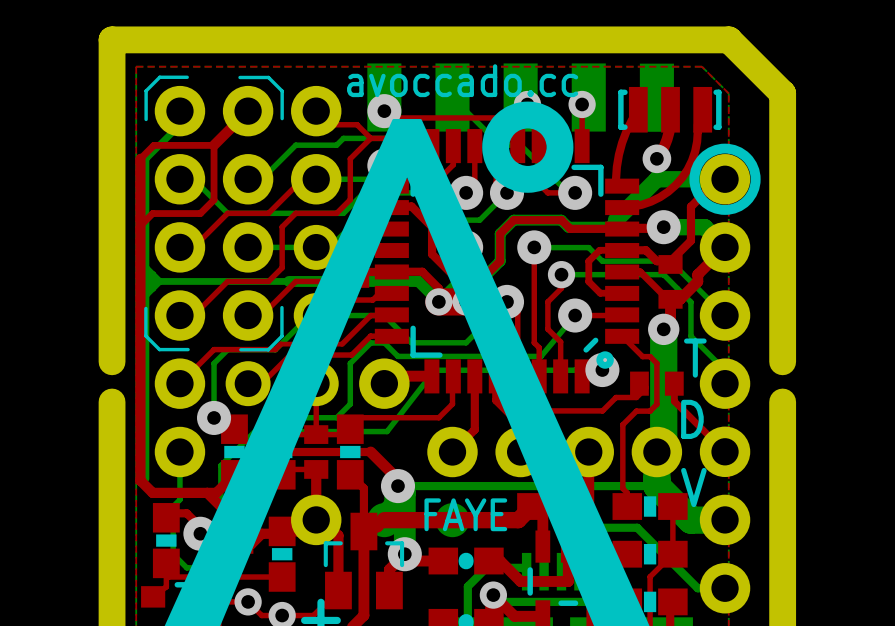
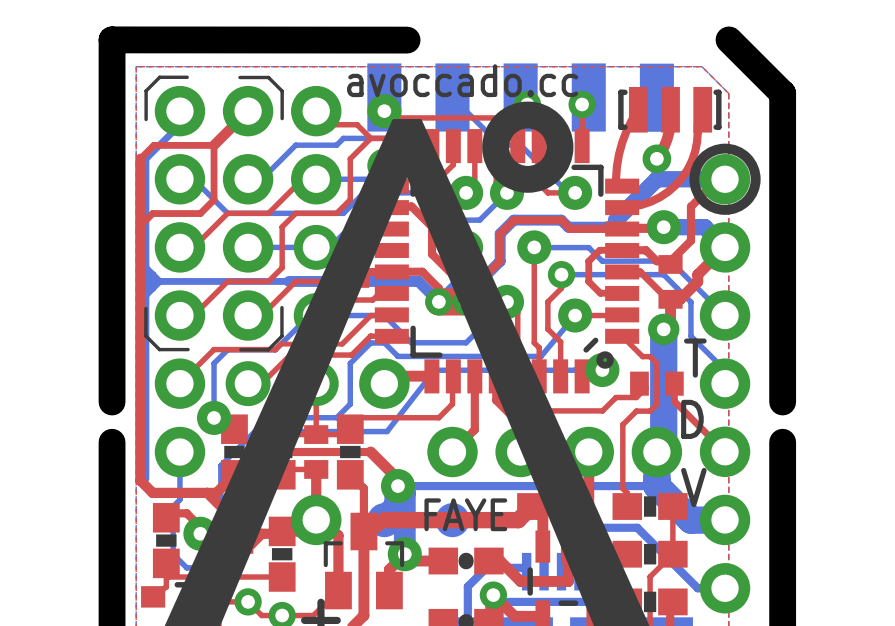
board edge: (112, 39) (729, 39) -> (112, 39) (407, 40)
board edge: (112, 402) (112, 442) -> (112, 402) (112, 361)
board edge: (782, 402) (782, 442) -> (782, 402) (782, 361)

